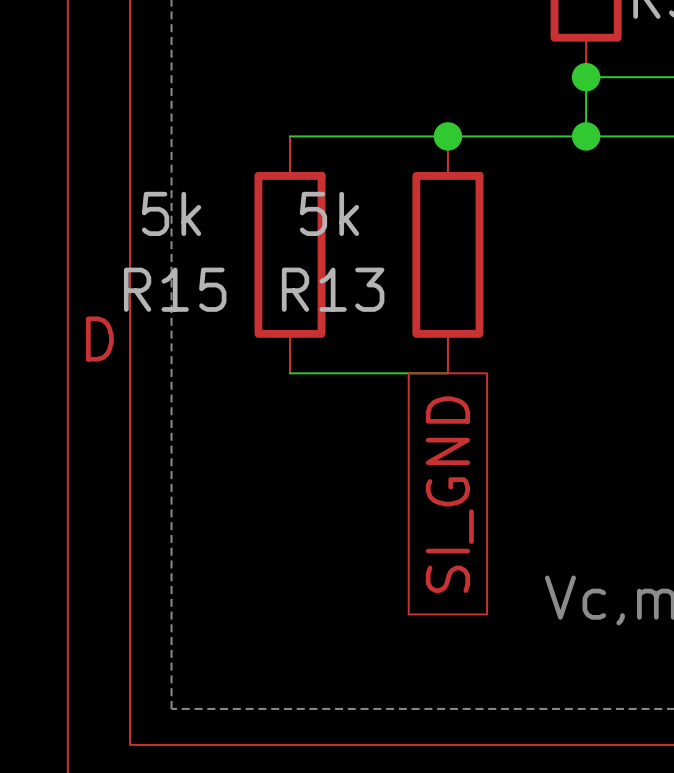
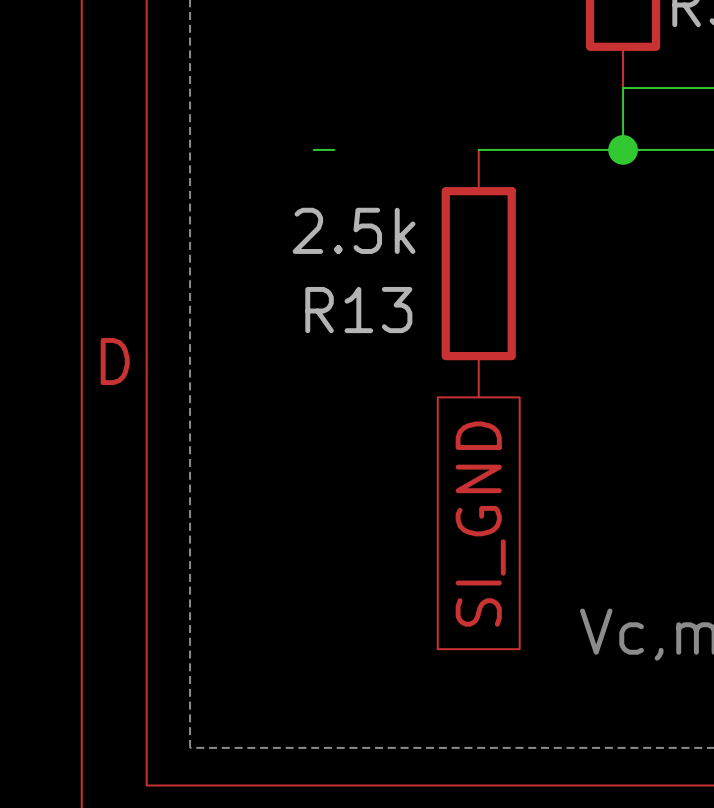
junction: (586, 77) -> none
wire: (309, 136) (447, 136) -> none
junction: (447, 136) -> none
R13 text: 5k (329, 213) -> 2.5k (354, 230)
R15: (289, 254) -> none
wire: (289, 373) (447, 373) -> none

